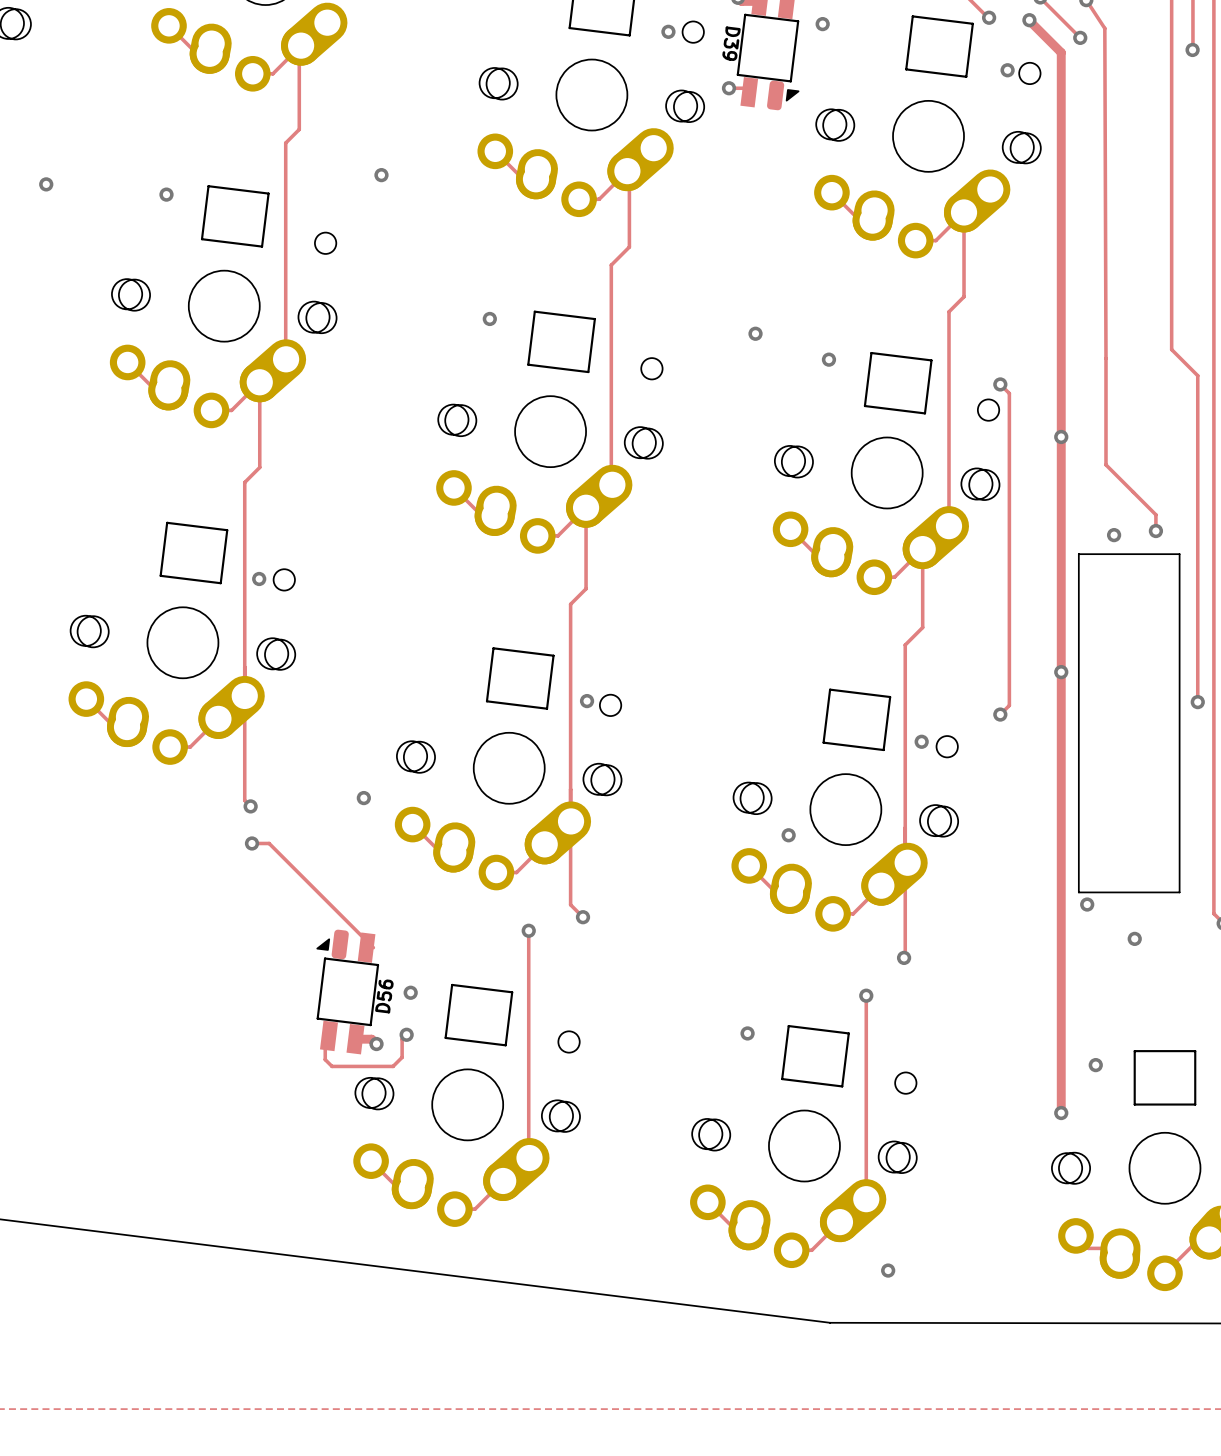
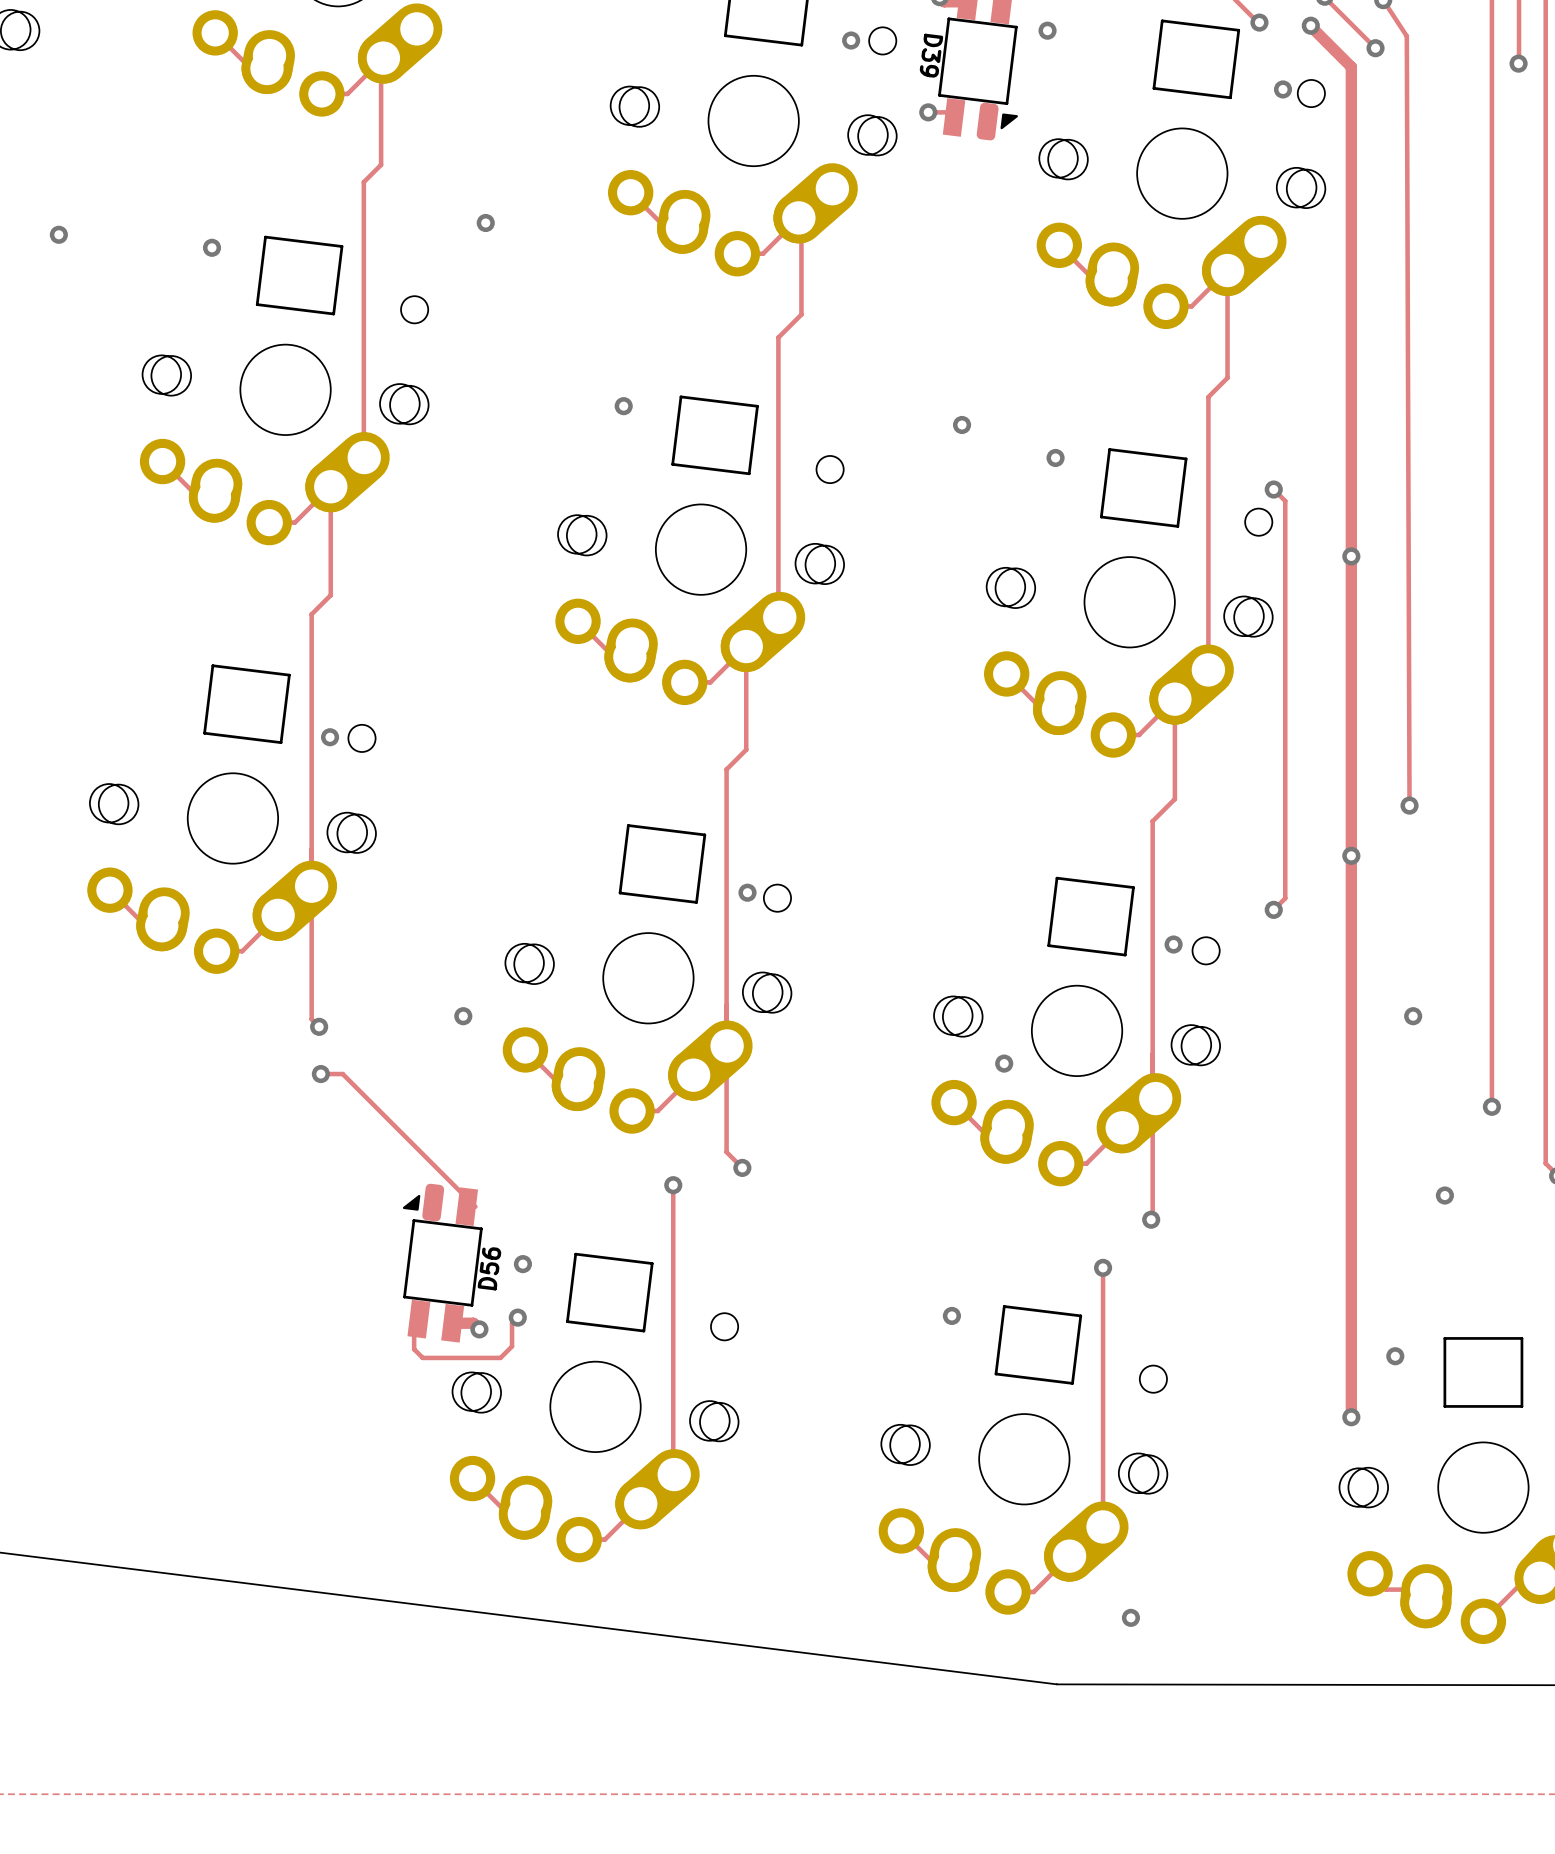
track: (1171, 349) (1197, 375) (1197, 702) -> (1491, 445) (1491, 1106)
track: (1105, 358) (1105, 464) (1155, 514) (1155, 531) -> (1408, 456) (1409, 805)
via: (1155, 531) -> none
via: (1114, 535) -> none
board edge: (1078, 554) (1179, 554) (1179, 892) (1078, 892) (1078, 554) -> none
via: none -> (1409, 805)
via: (1197, 702) -> none
via: none -> (1413, 1016)
via: none -> (1491, 1106)
via: (1087, 904) -> none

